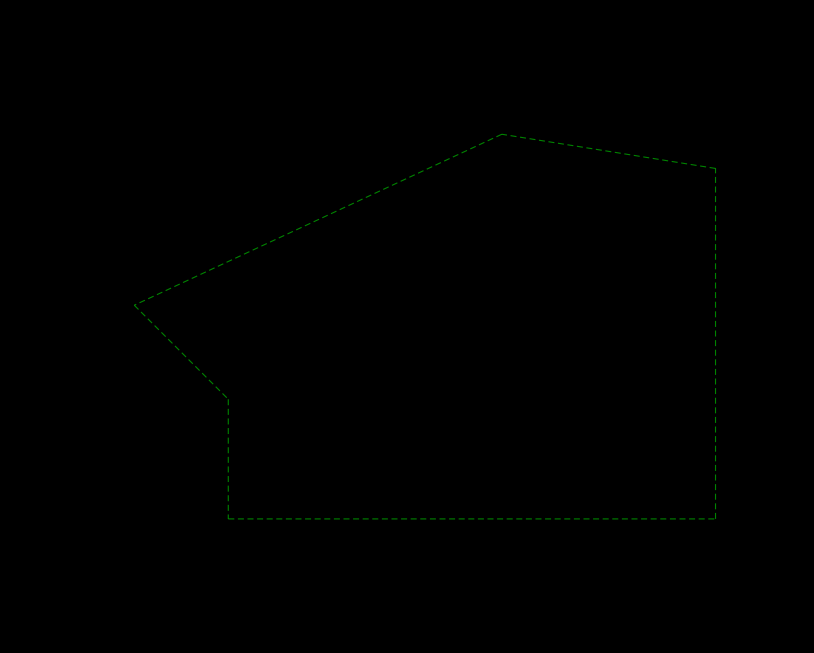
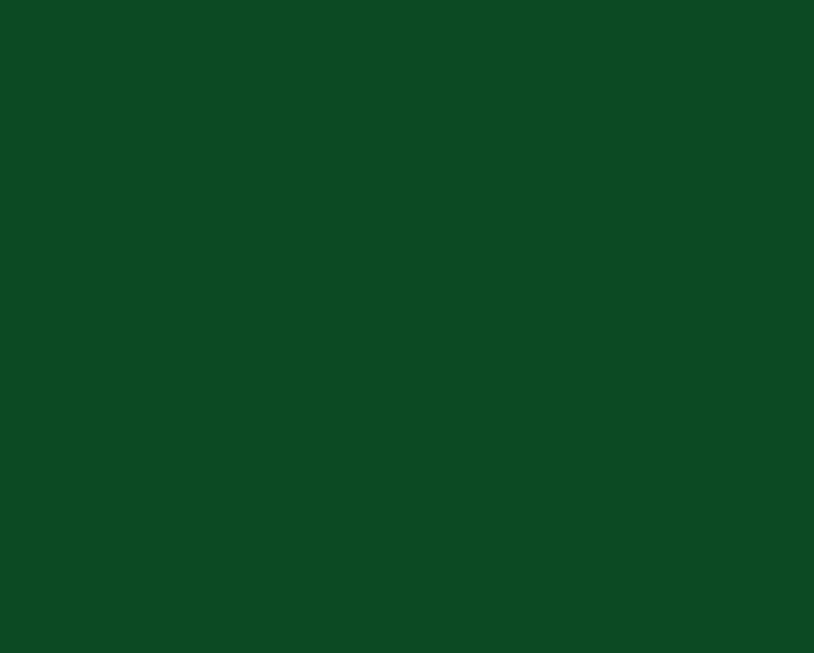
zone outline: (501, 134) (134, 305) (228, 399) (228, 518) (715, 518) (715, 168) (501, 134) -> none

